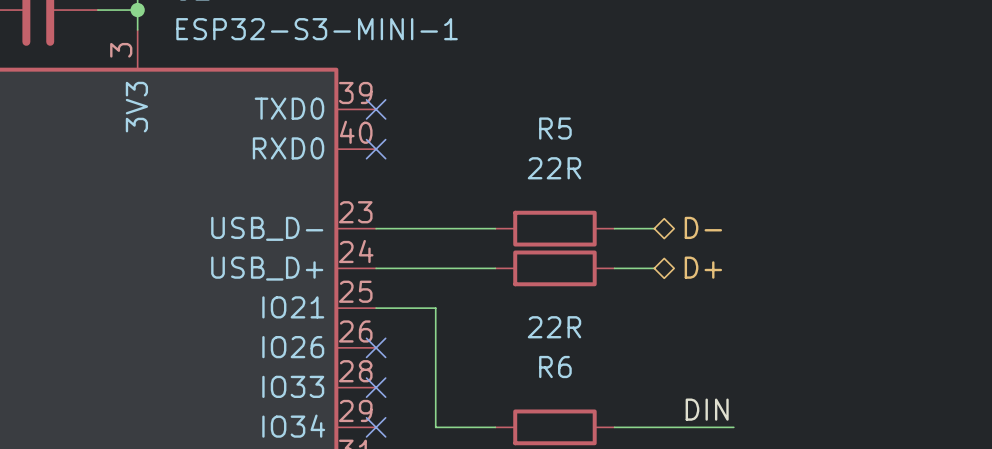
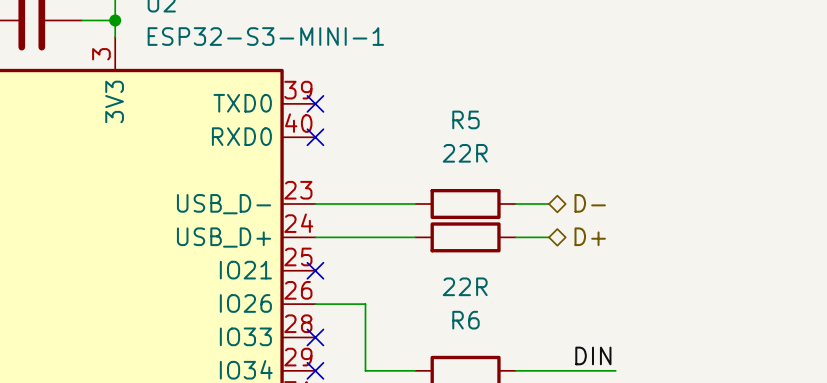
wire: (376, 308) (435, 308) (435, 347) -> (315, 304) (365, 304)
no-connect mark position: (376, 347) -> (315, 270)

